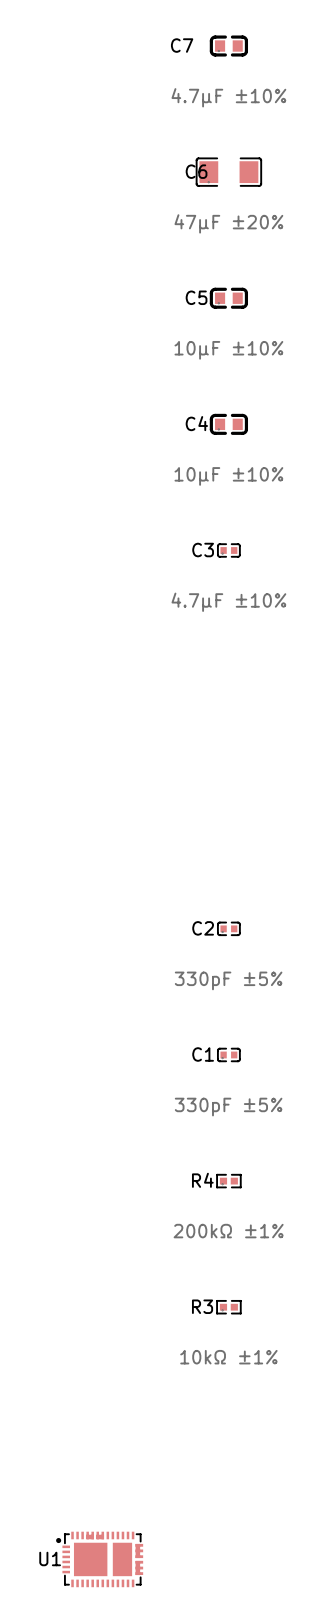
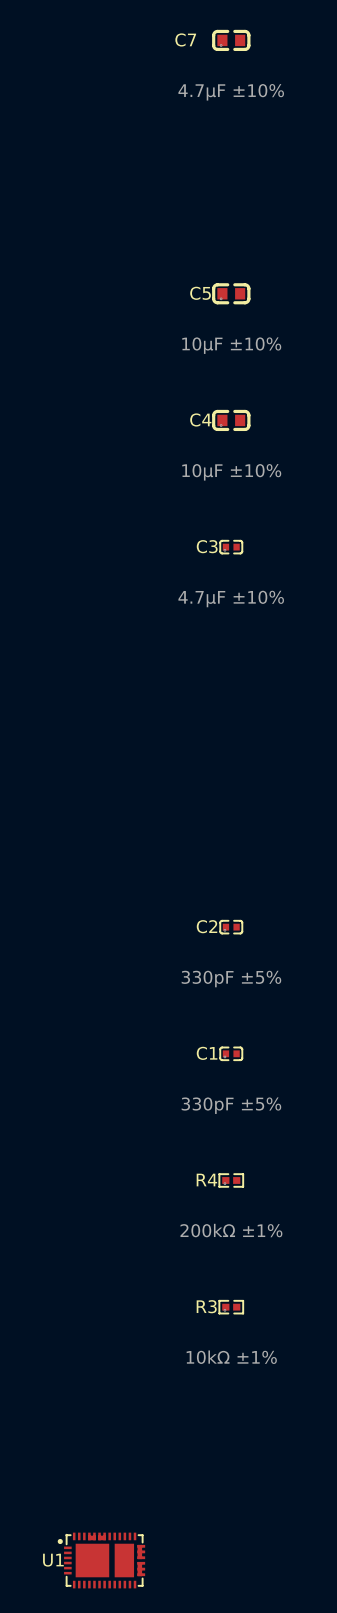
C6: 47µF ±20% (228, 172) -> none

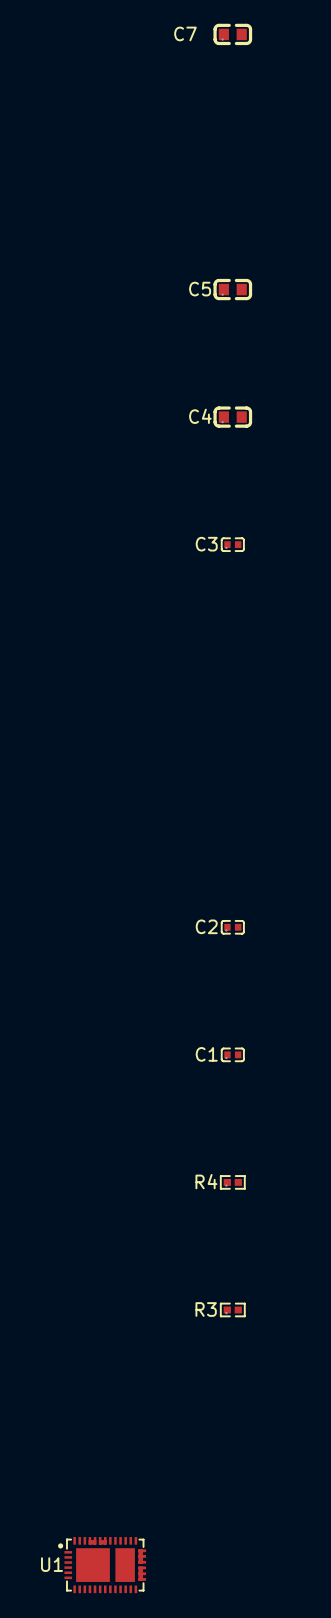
C7 value: 4.7µF ±10% (231, 92) -> none
C5 value: 10µF ±10% (231, 345) -> none
C4 value: 10µF ±10% (231, 472) -> none
C3 value: 4.7µF ±10% (231, 599) -> none
C2 value: 330pF ±5% (231, 979) -> none
C1 value: 330pF ±5% (231, 1105) -> none
R4 value: 200kΩ ±1% (231, 1230) -> none
R3 value: 10kΩ ±1% (231, 1357) -> none

